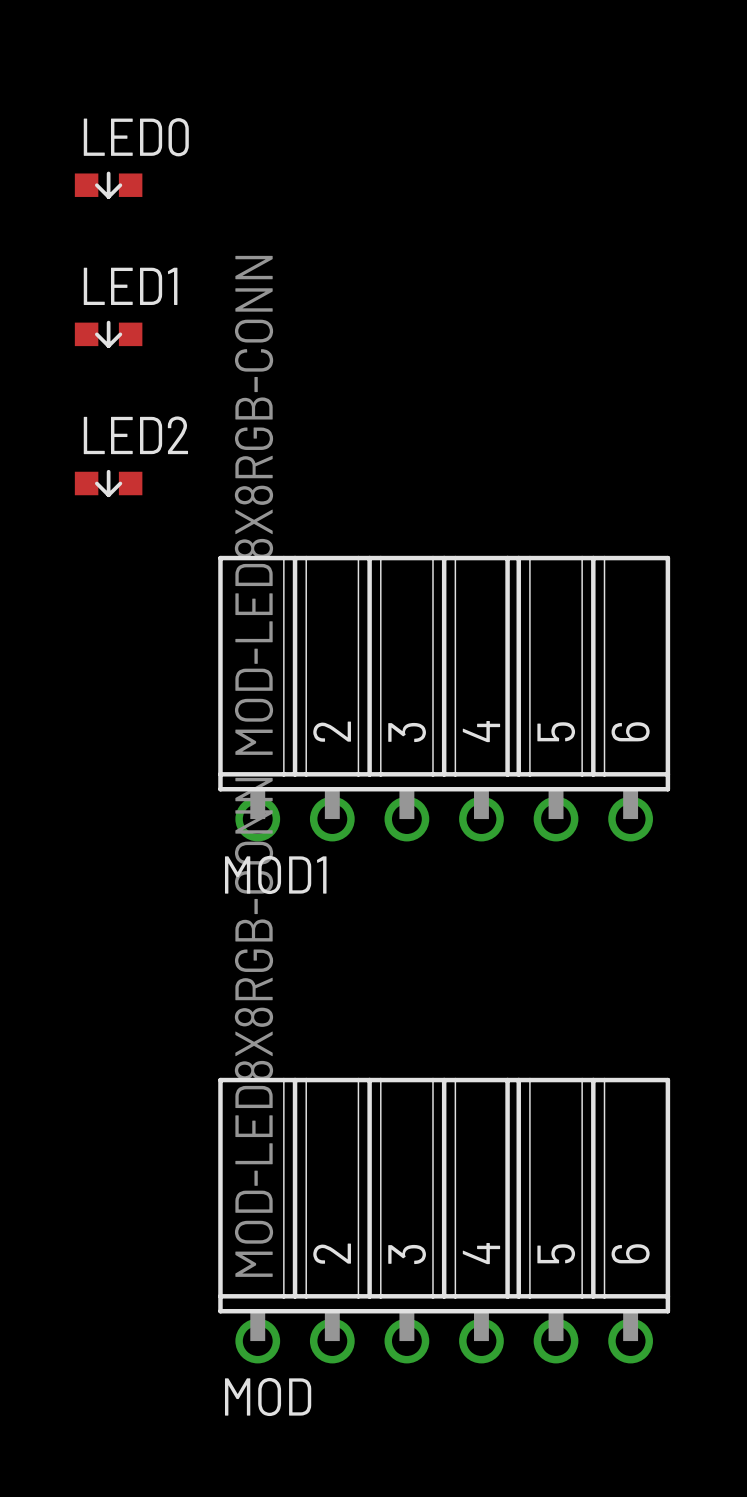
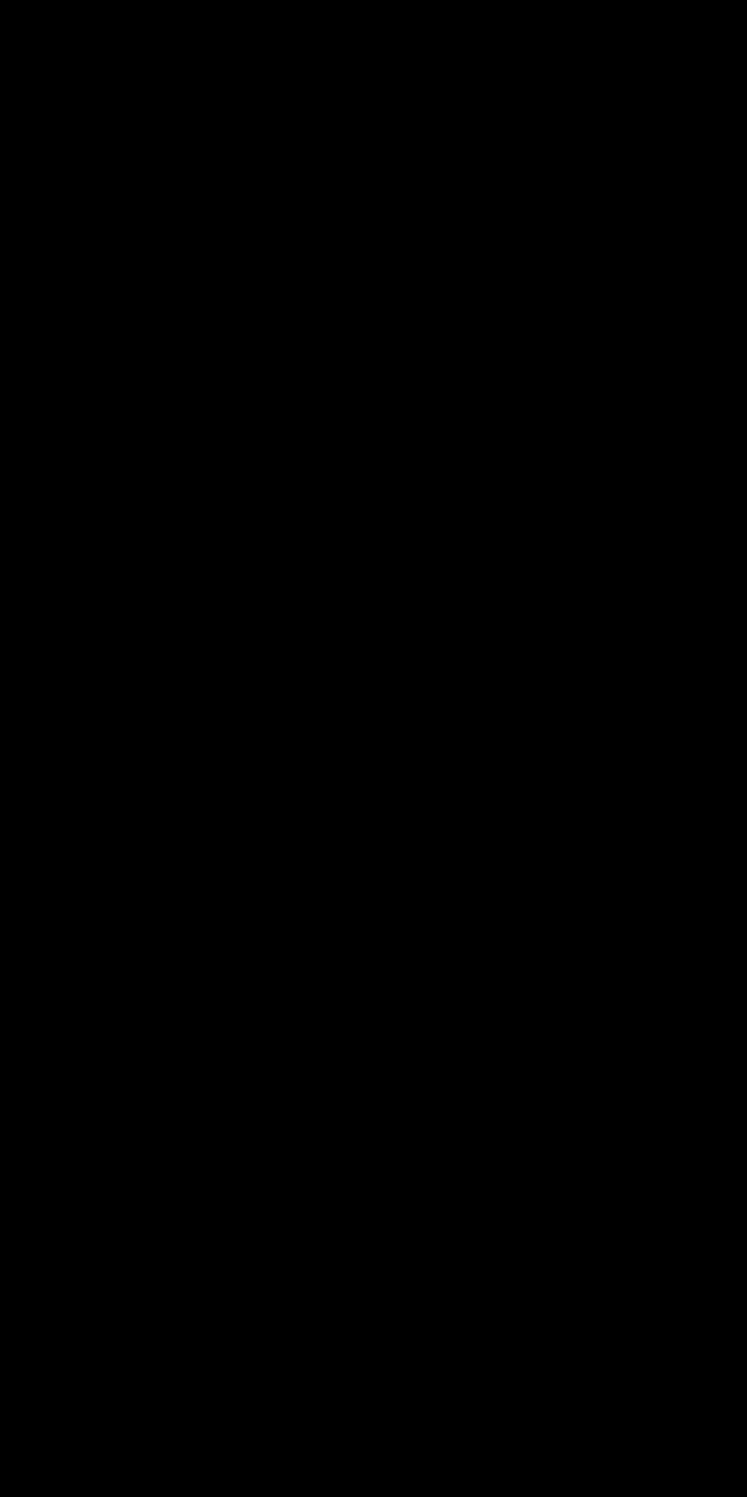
LED0: (108, 185) -> none
LED1: (108, 334) -> none
LED2: (108, 483) -> none
MOD1: MOD-LED8X8RGB-CONN (444, 698) -> none
MOD: MOD-LED8X8RGB-CONN (444, 1220) -> none

